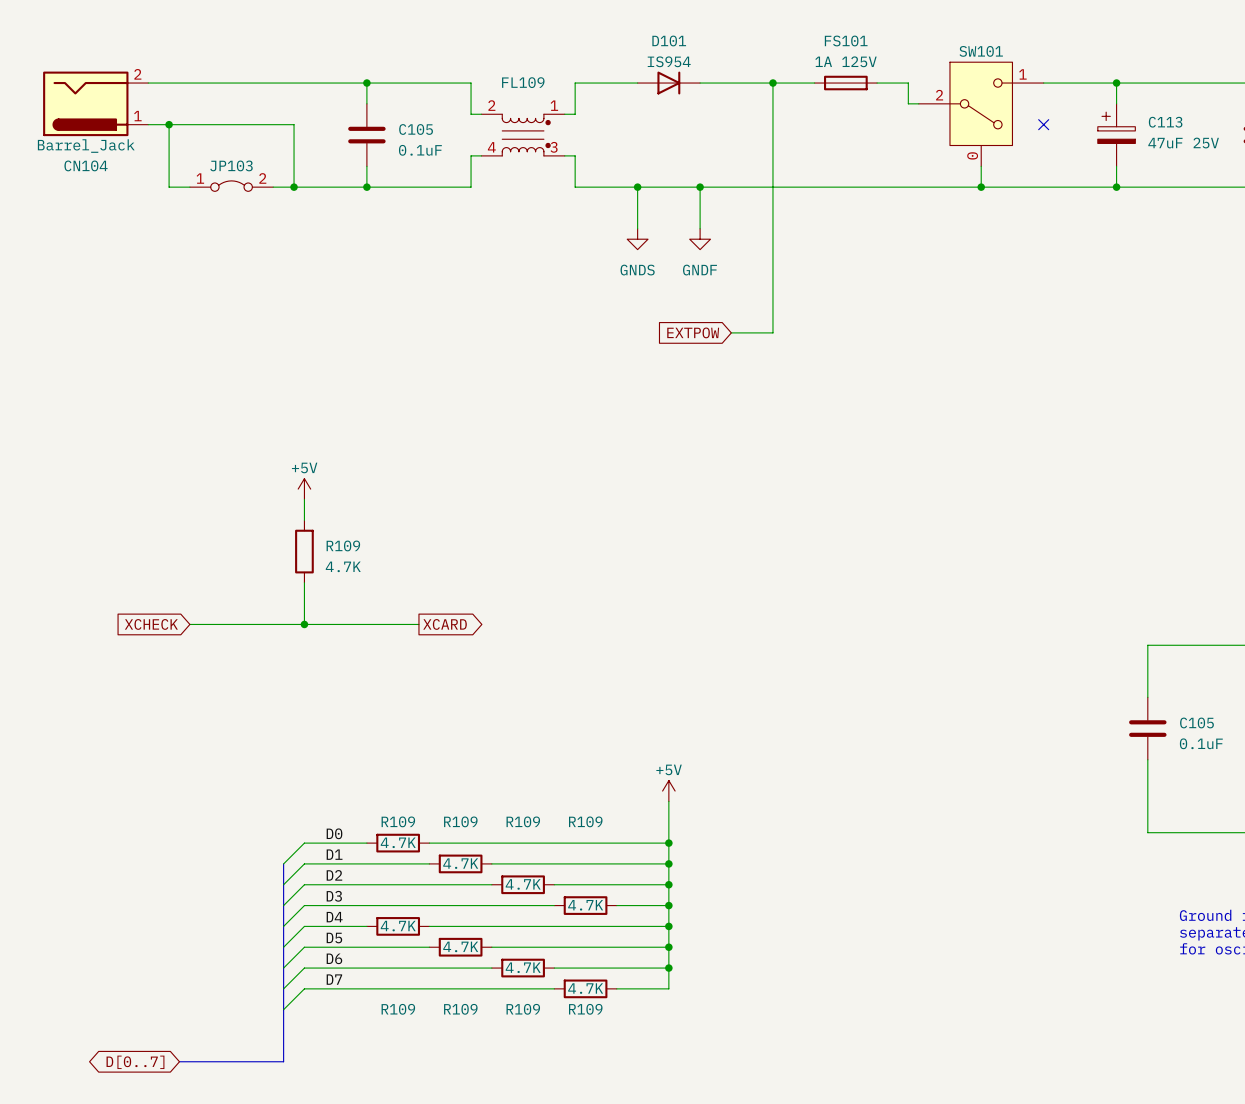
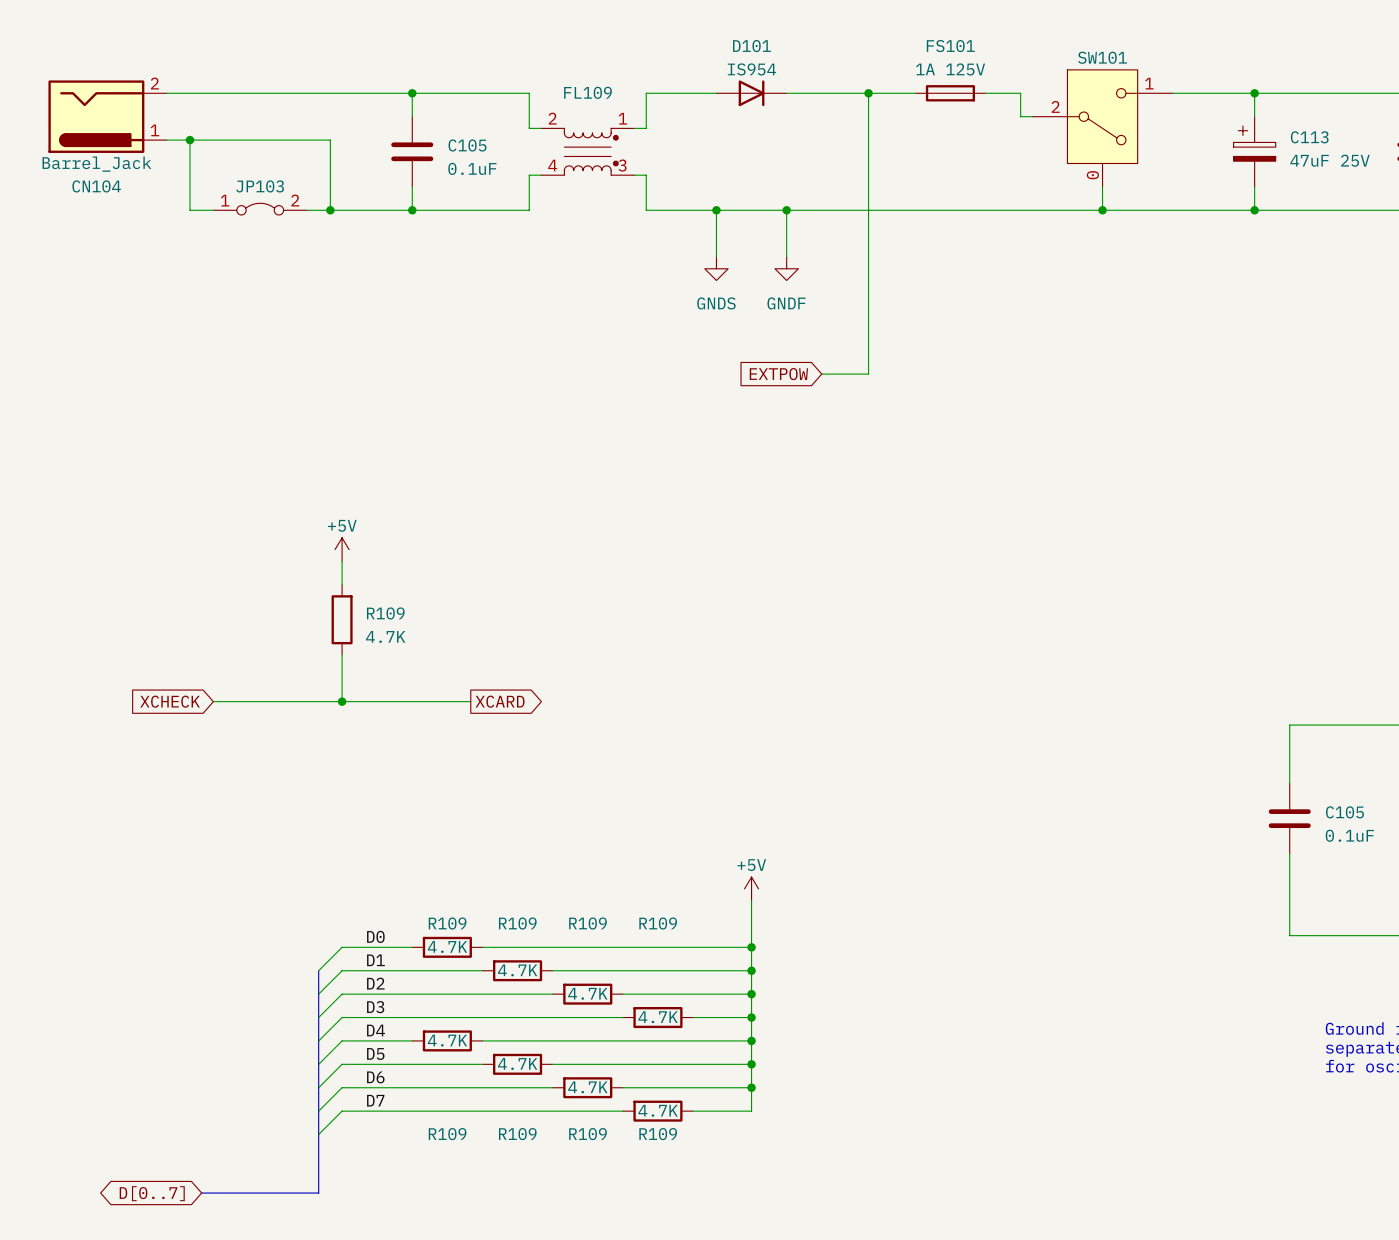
no-connect mark: (1043, 124) -> none

